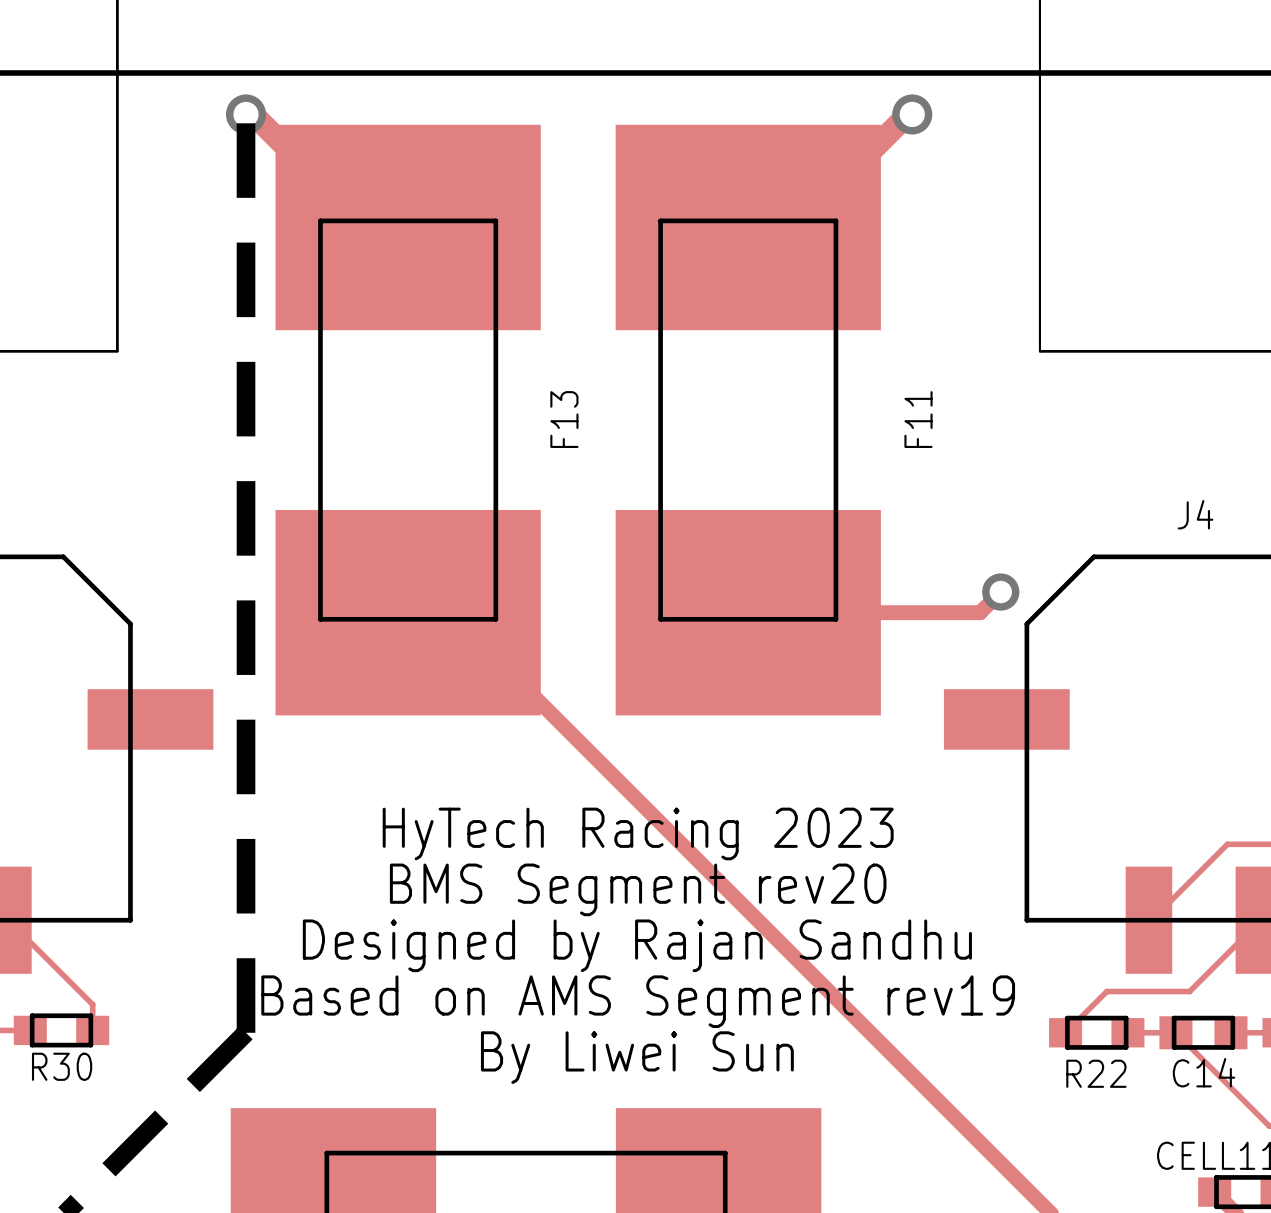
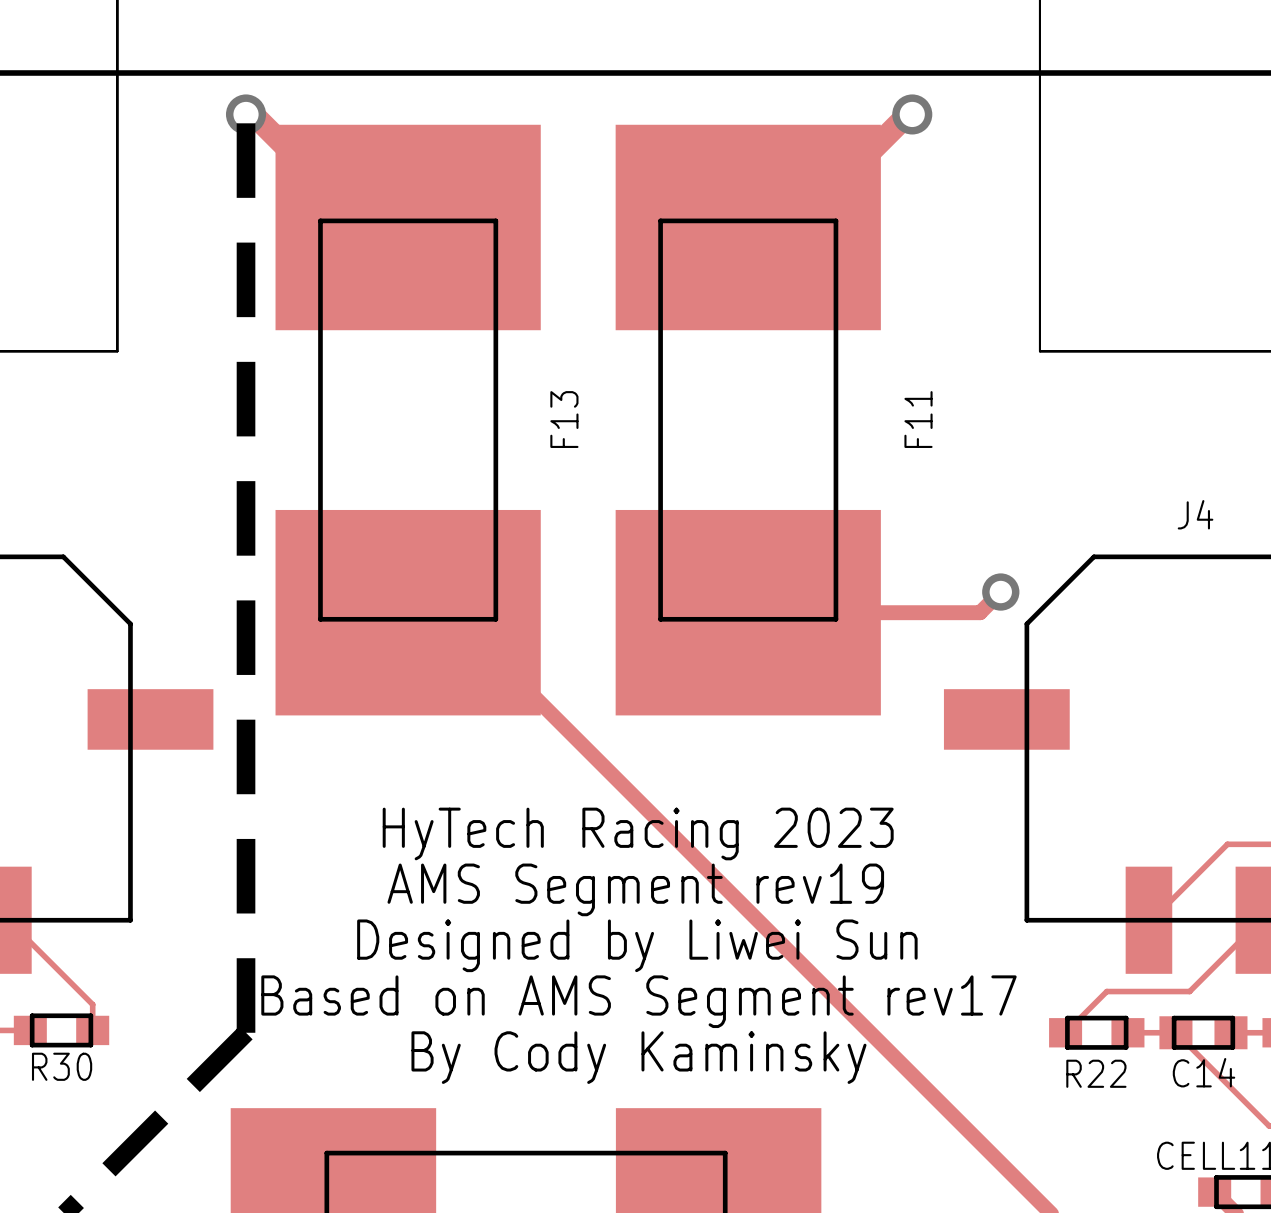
text: BMS Segment rev20 (638, 889) -> AMS Segment rev19 (635, 889)
text: Designed by Rajan Sandhu (637, 945) -> Designed by Liwei Sun (637, 945)
text: Based on AMS Segment rev19 (638, 1001) -> Based on AMS Segment rev17 (638, 1001)
text: By Liwei Sun (637, 1057) -> By Cody Kaminsky (638, 1057)

